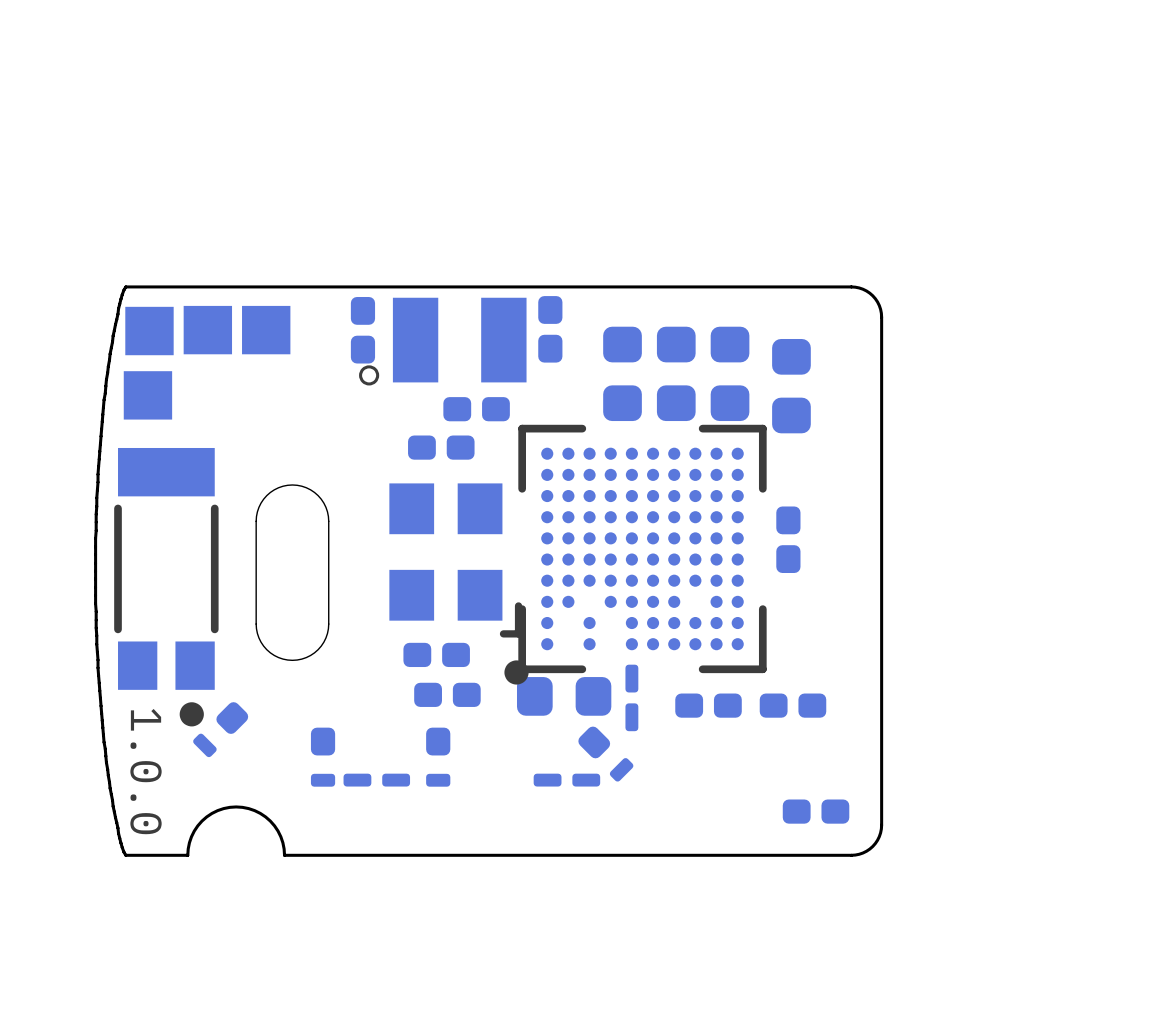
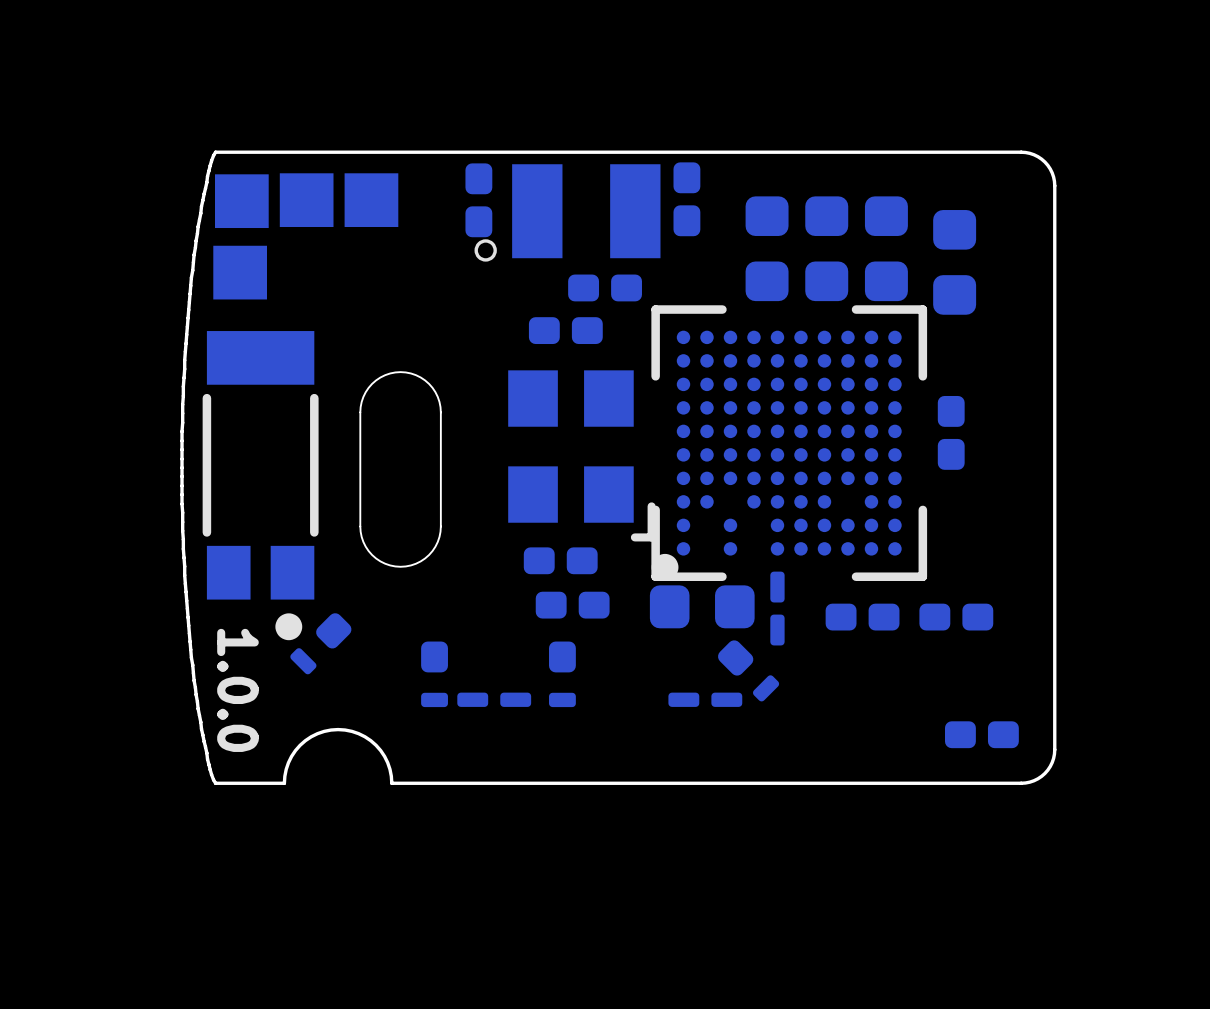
part footprint: [504, 424, 767, 685] -> [651, 305, 928, 581]

